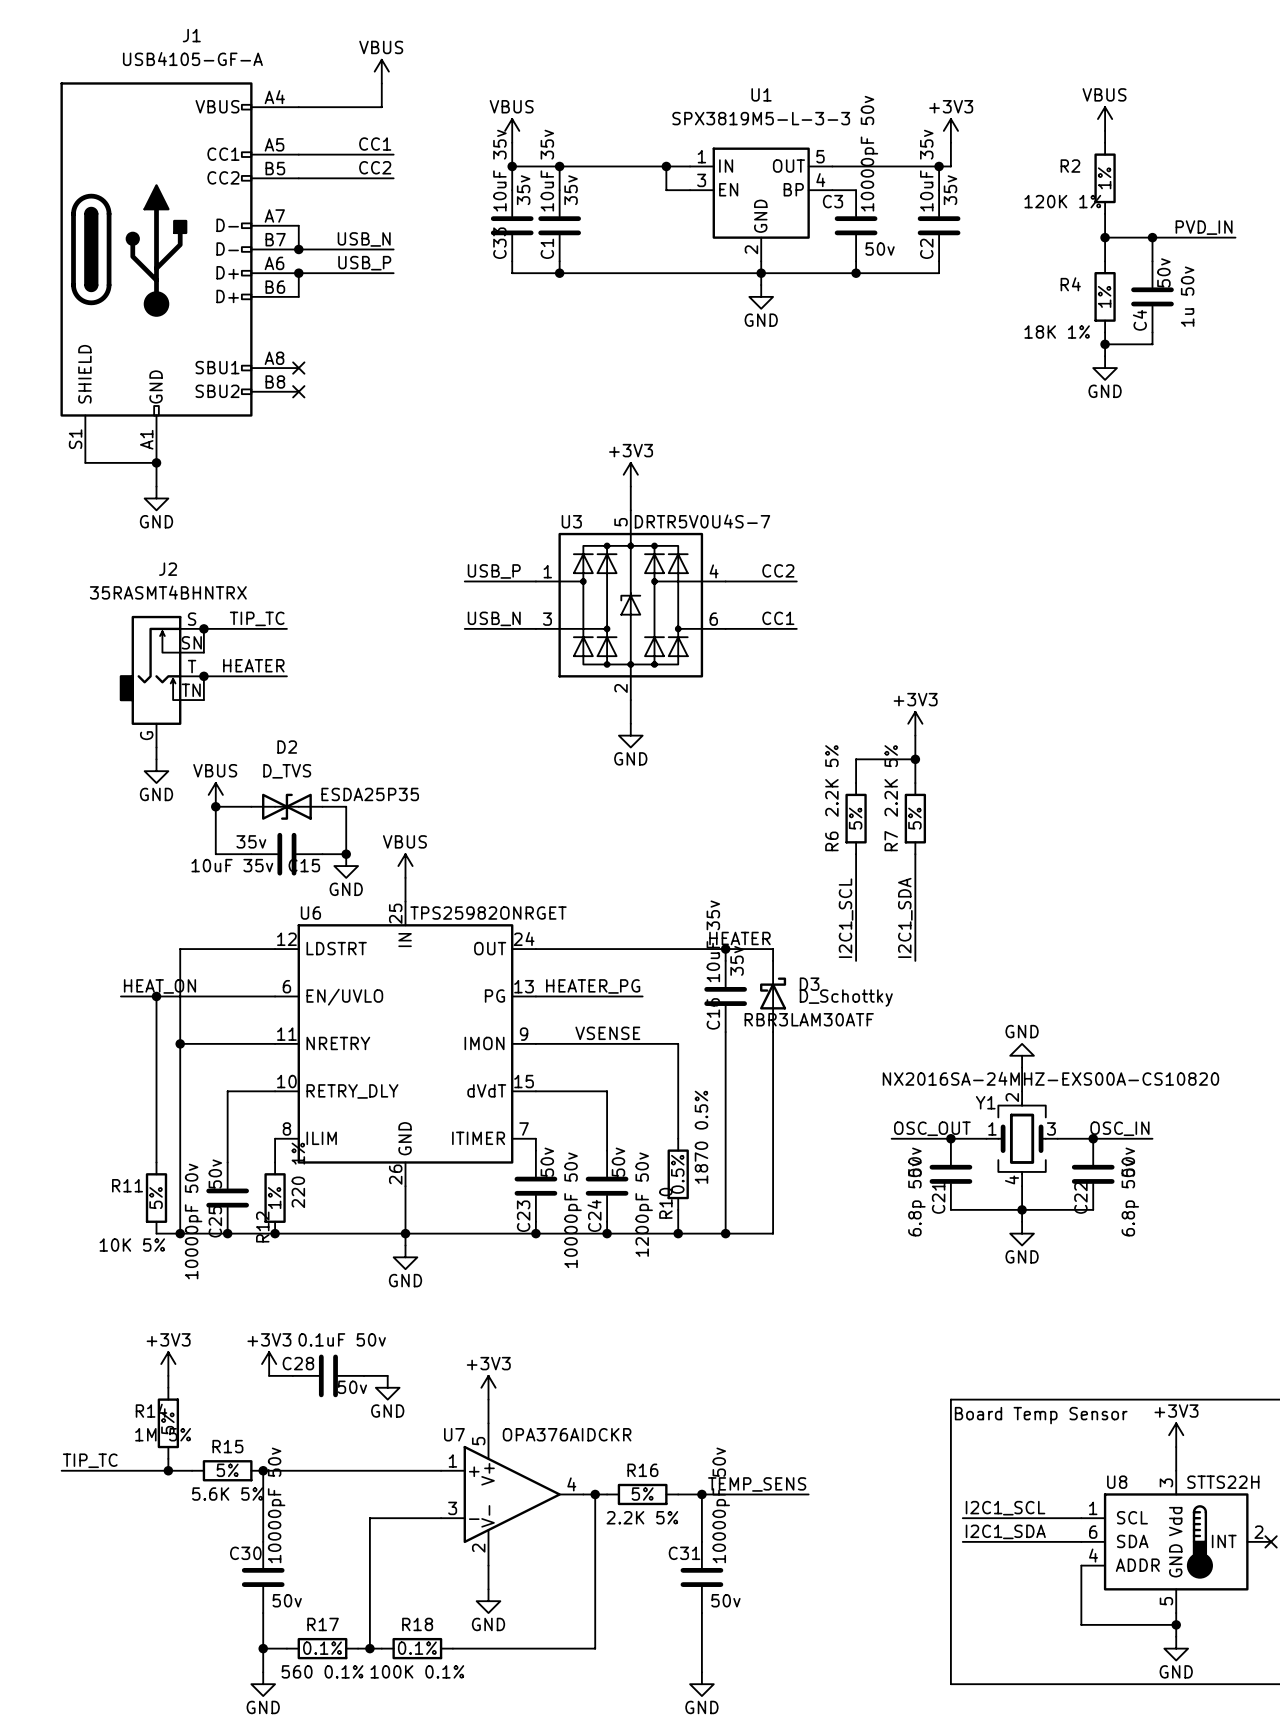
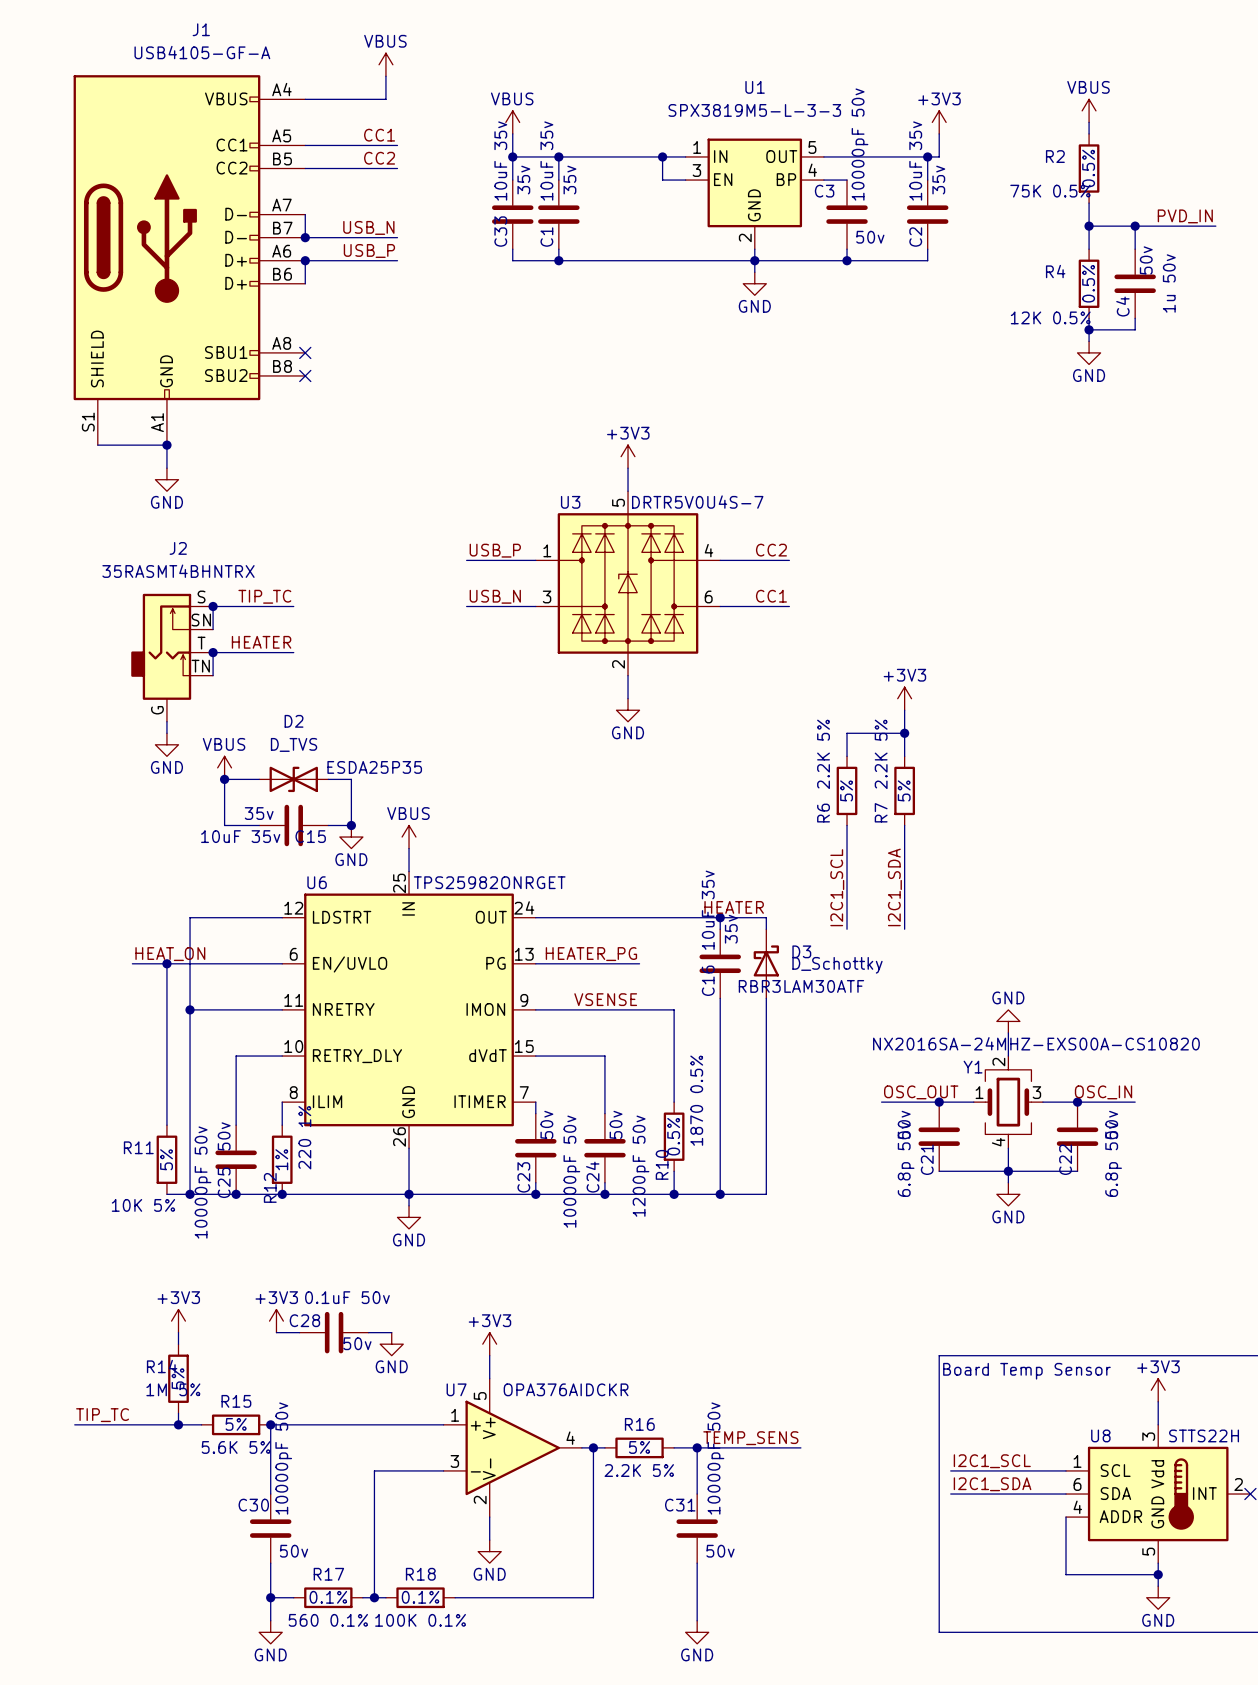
R2 text: 1% (1104, 178) -> 0.5% (1088, 168)
R2 value: 120K 1% (1062, 201) -> 75K 0.5% (1050, 191)
R4 text: 1% (1104, 296) -> 0.5% (1088, 283)
R4 value: 18K 1% (1057, 332) -> 12K 0.5% (1050, 317)

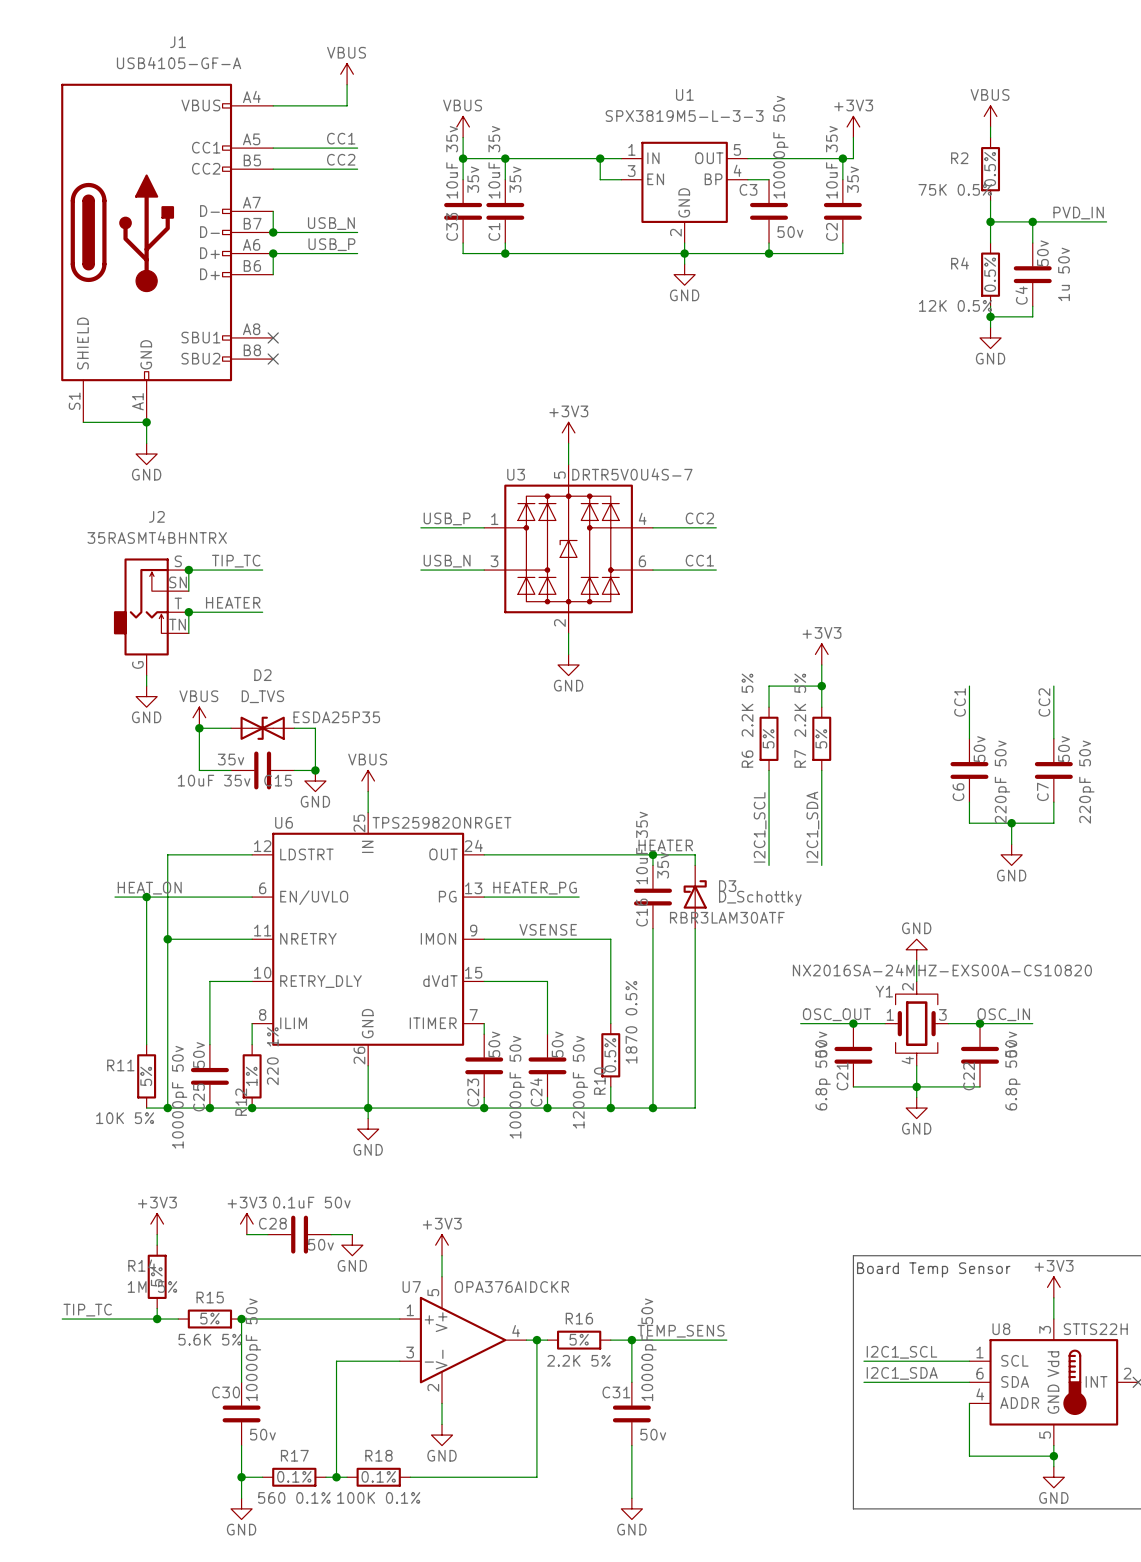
wire: none -> (969, 686) (969, 738)
wire: none -> (1053, 686) (1053, 738)
label: none -> CC1 (960, 702)
label: none -> CC2 (1044, 702)
C6: none -> 220pF 50v (969, 770)
C7: none -> 220pF 50v (1053, 770)
wire: none -> (969, 802) (969, 823) (1053, 823) (1053, 802)
wire: none -> (1011, 823) (1011, 844)
junction: none -> (1011, 823)
power symbol: none -> GND (1011, 854)

